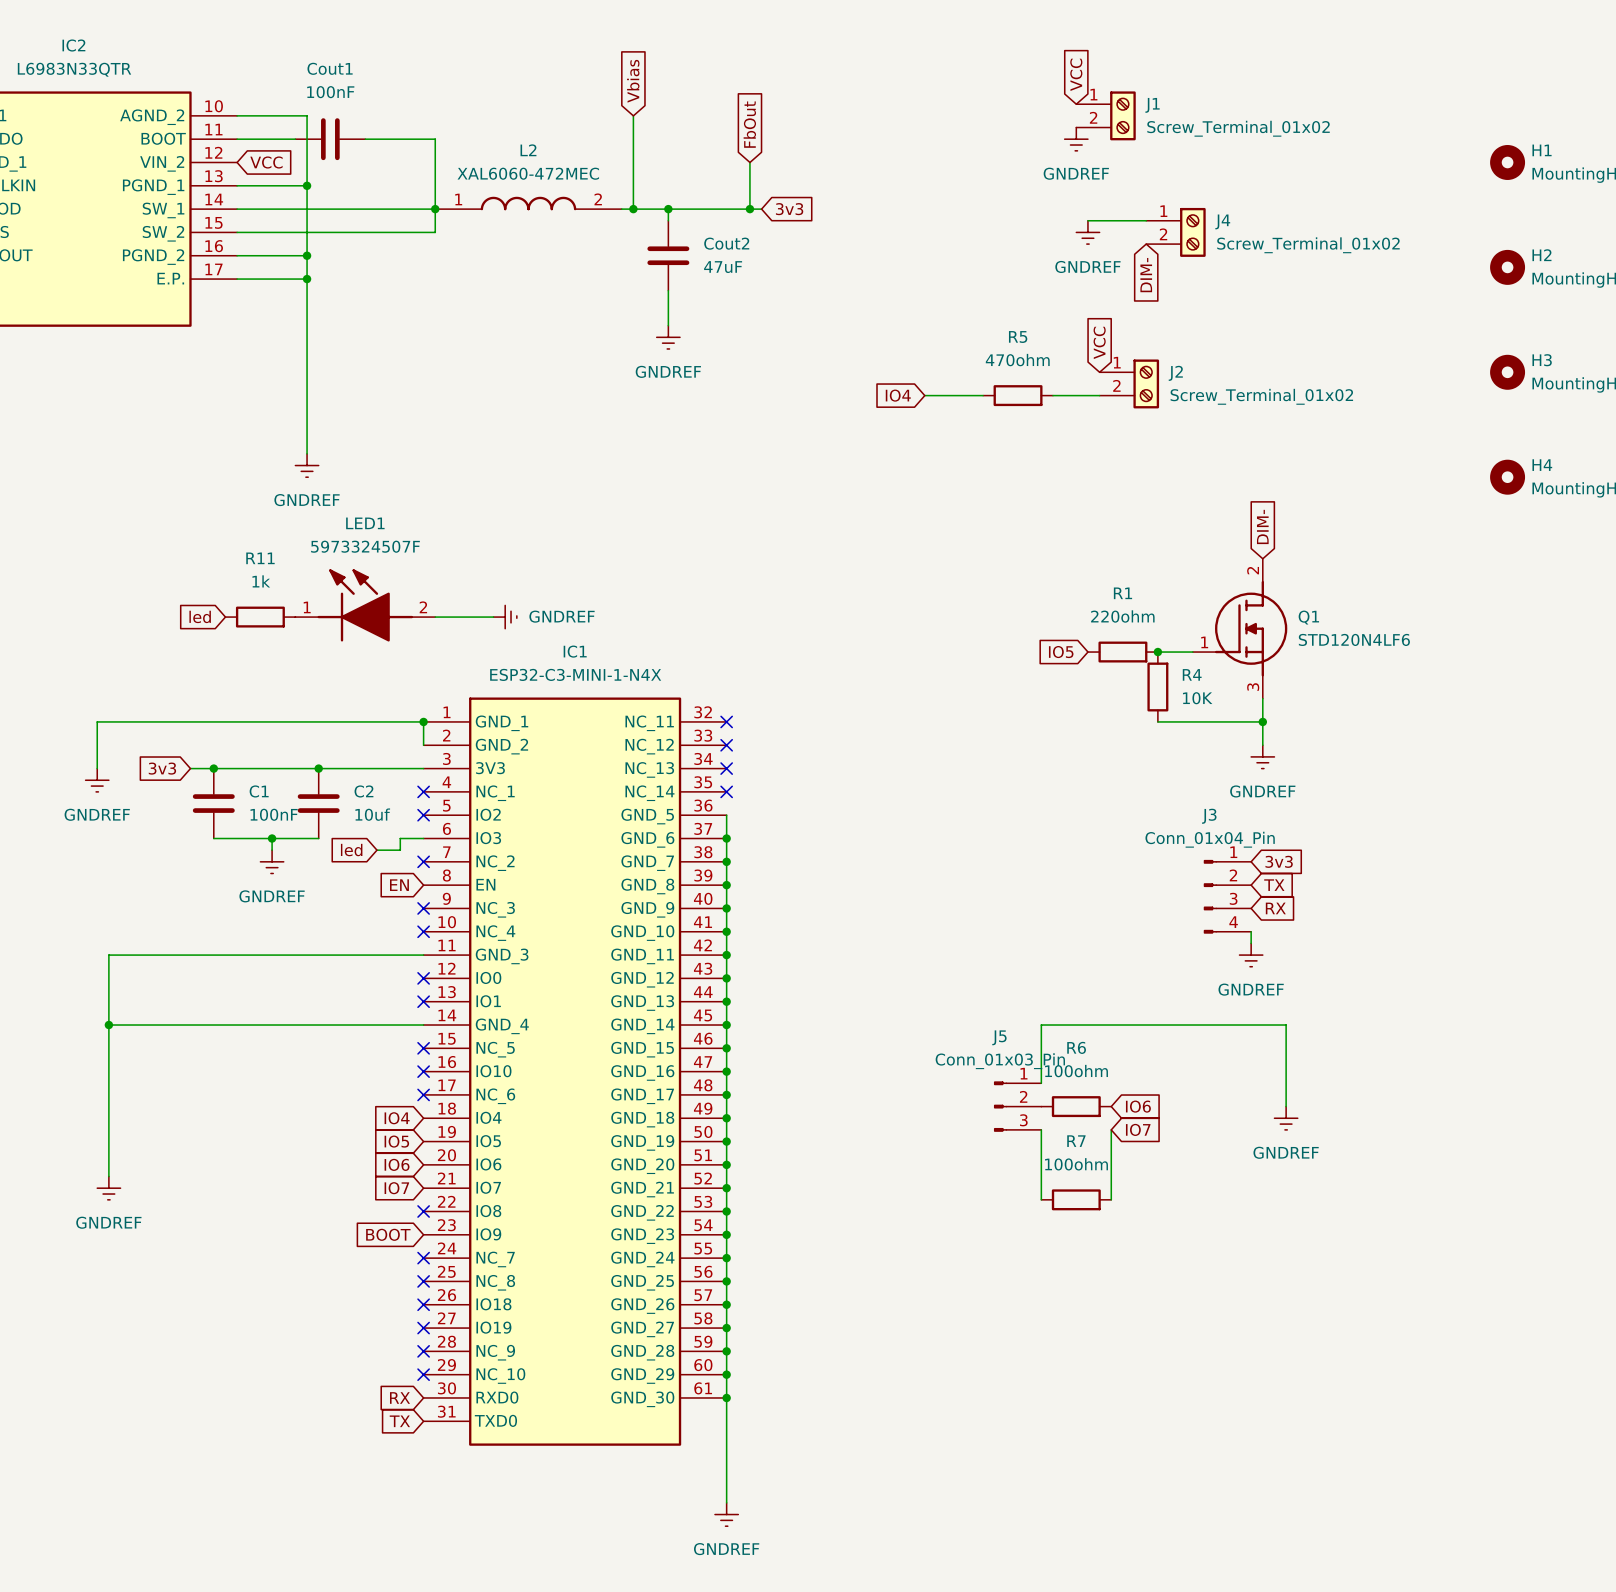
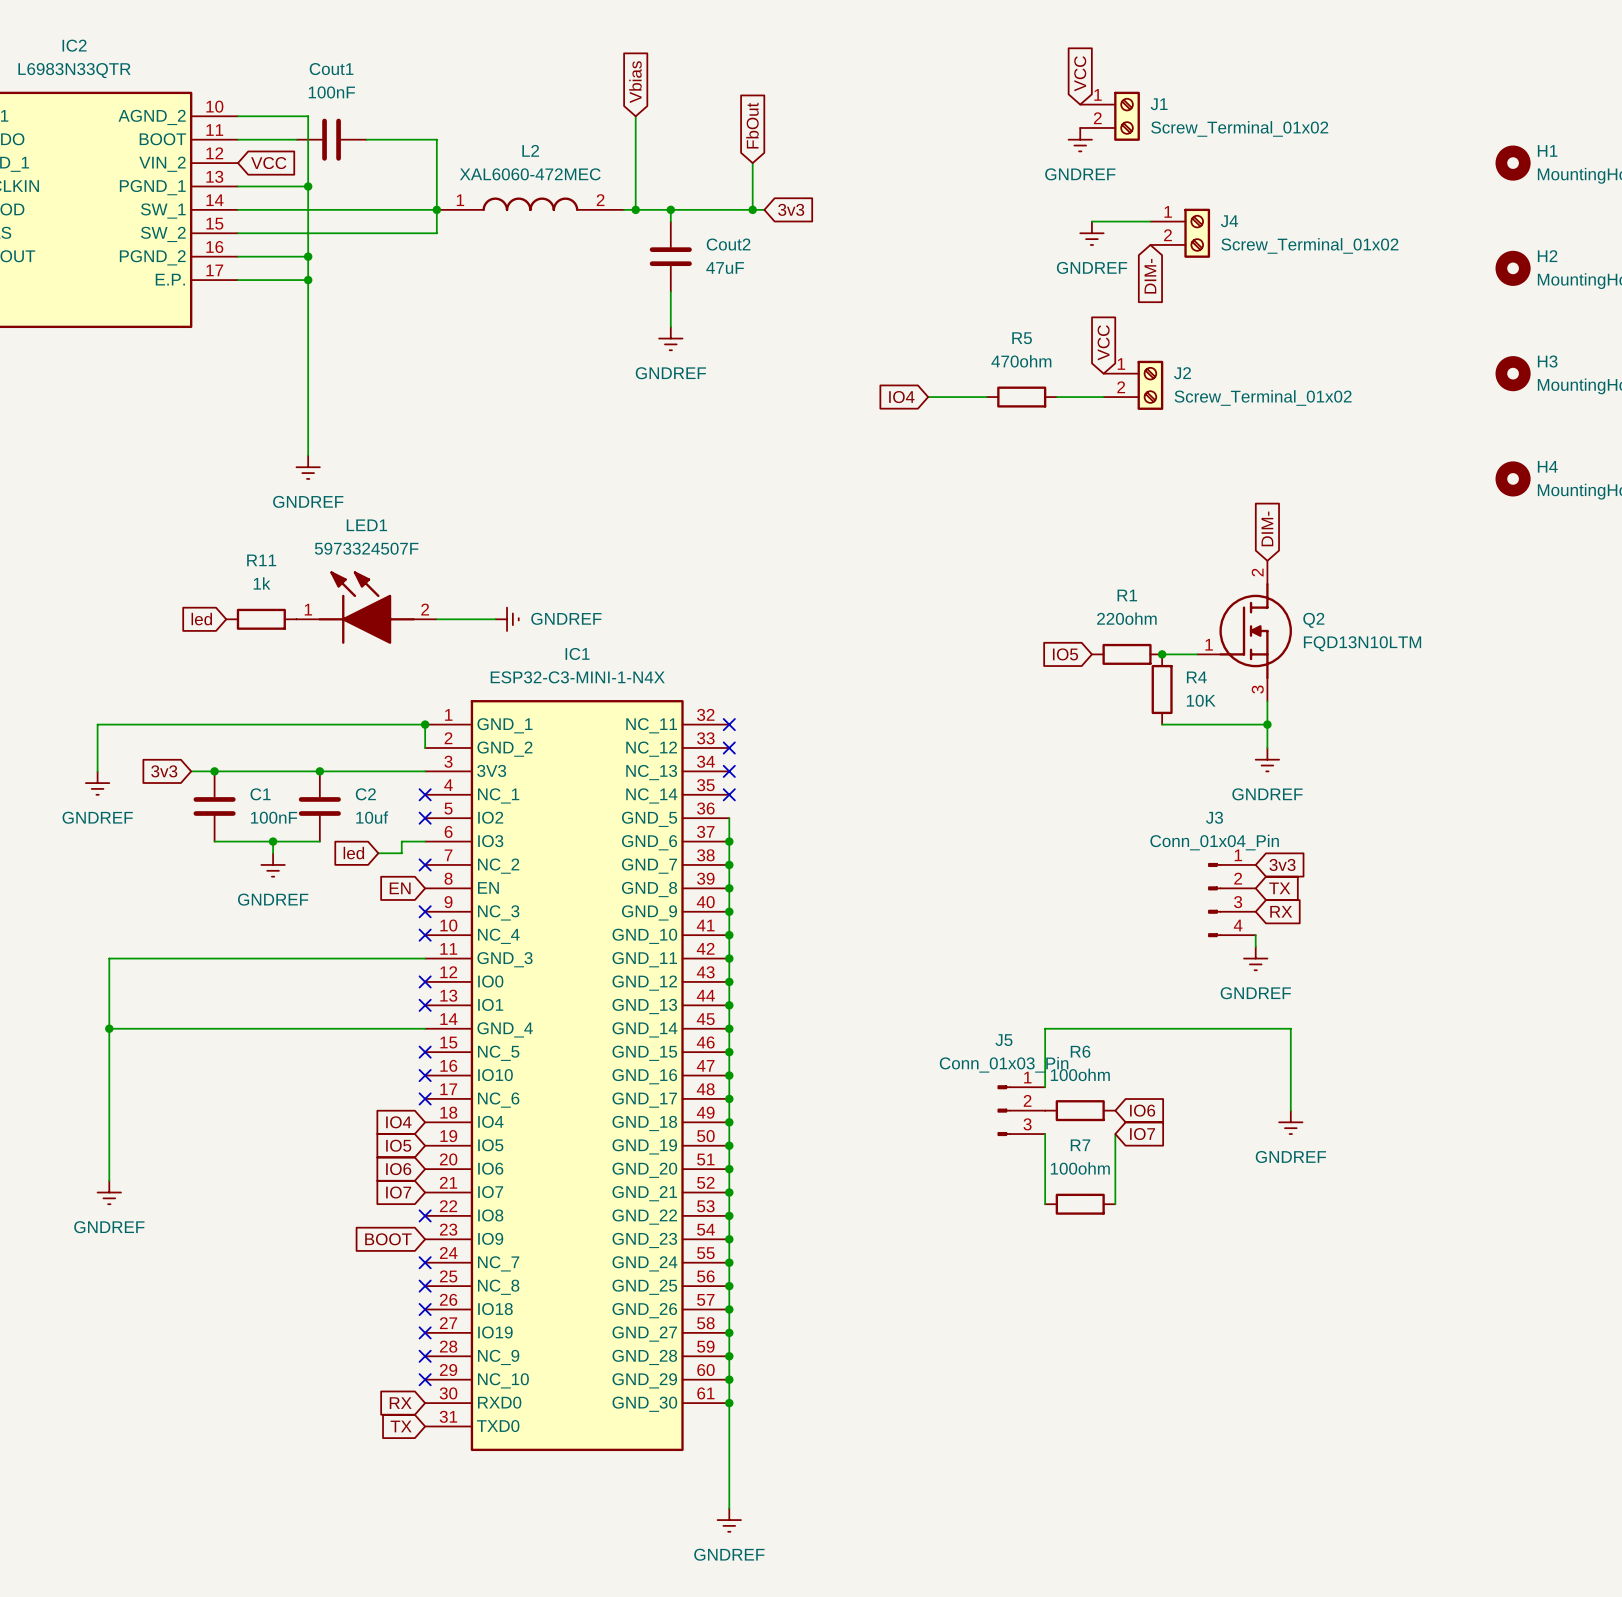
Q1 name: Q1 (1308, 617) -> Q2 (1313, 620)
Q1 value: STD120N4LF6 (1354, 639) -> FQD13N10LTM (1362, 643)

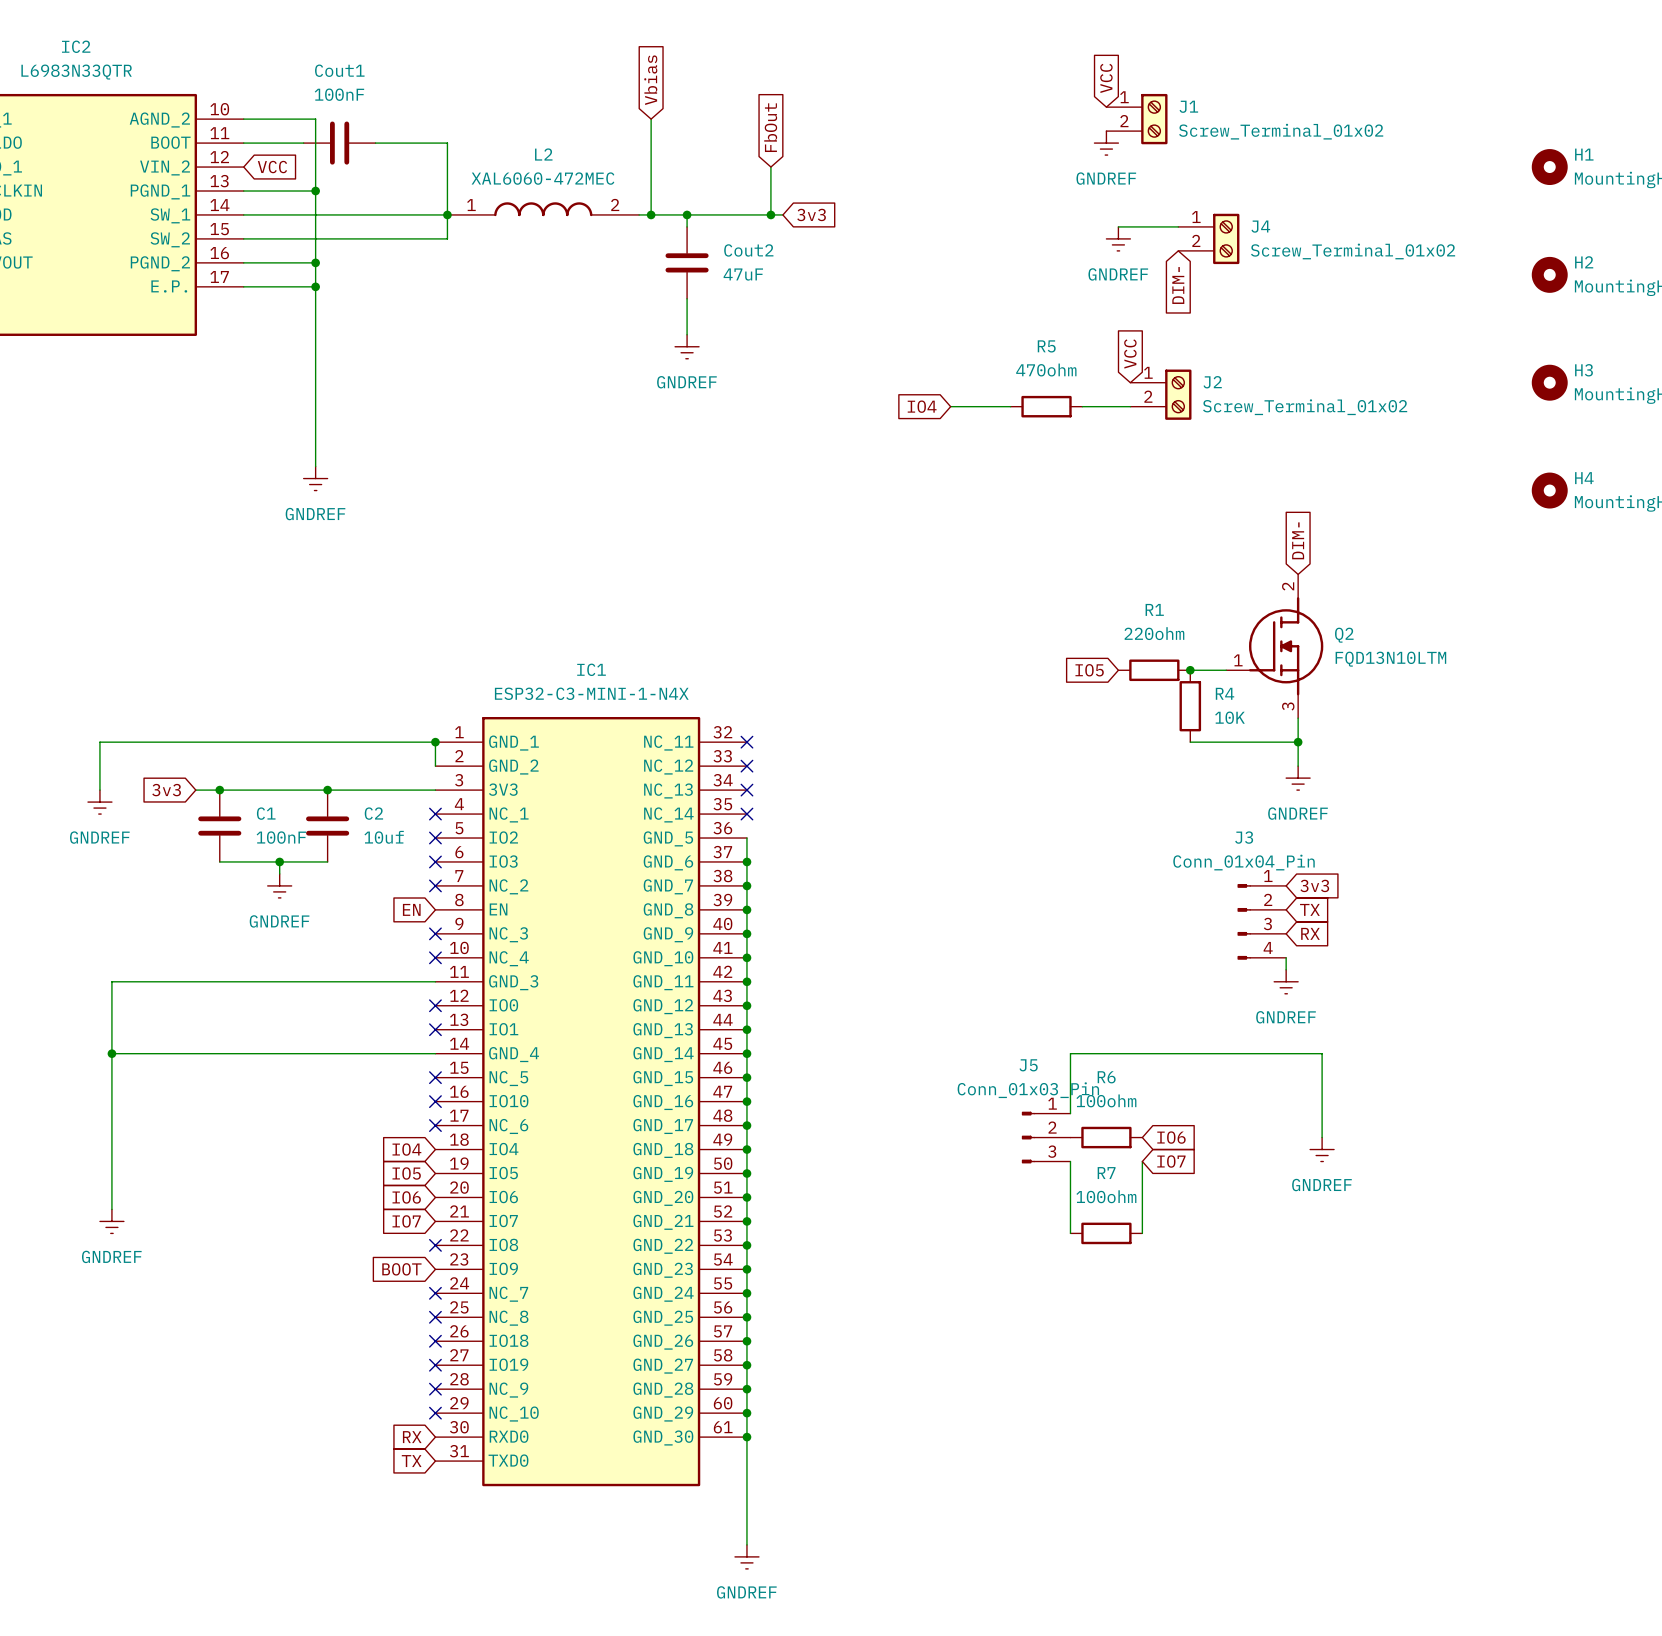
LED1: 5973324507F (366, 607) -> none
global label: led (201, 619) -> none
R11: 1k (261, 619) -> none
wire: (436, 619) (495, 619) -> none
power symbol: GNDREF (507, 619) -> none
wire: (425, 841) (401, 841) (401, 853) (378, 853) -> none
no-connect mark: none -> (435, 861)
global label: led (353, 853) -> none

